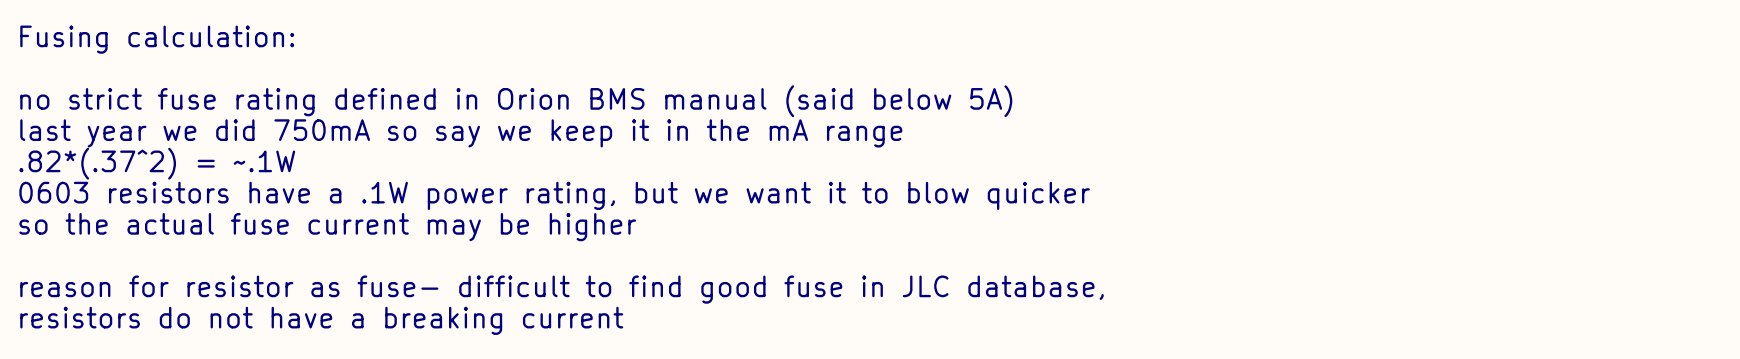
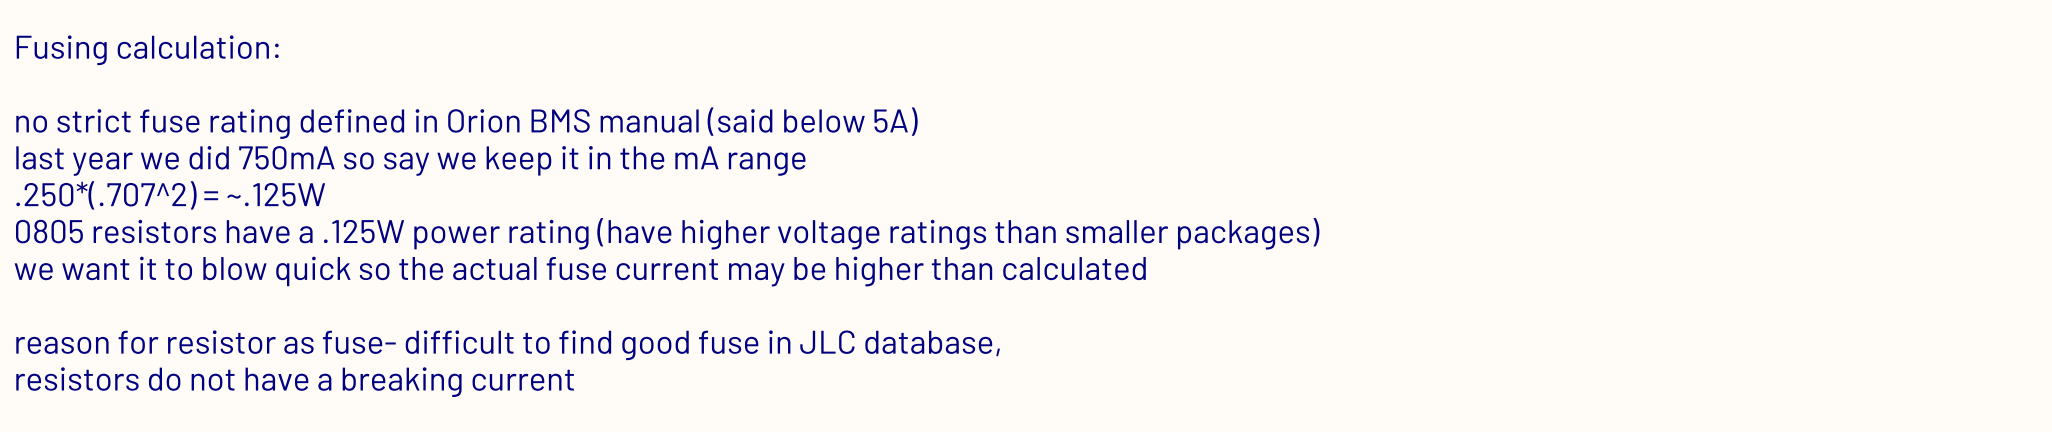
text: .82*(.37^2) = ~.1W (157, 163) -> .250*(.707^2) = ~.125W (170, 195)
text: 0603 resistors have a .1W power rating, but we want it to blow quicker (554, 195) -> 0805 resistors have a .125W power rating (have higher voltage ratings than smaller packages) (667, 233)
text: so the actual fuse current may be higher (327, 227) -> we want it to blow quick so the actual fuse current may be higher than calculated (580, 271)

